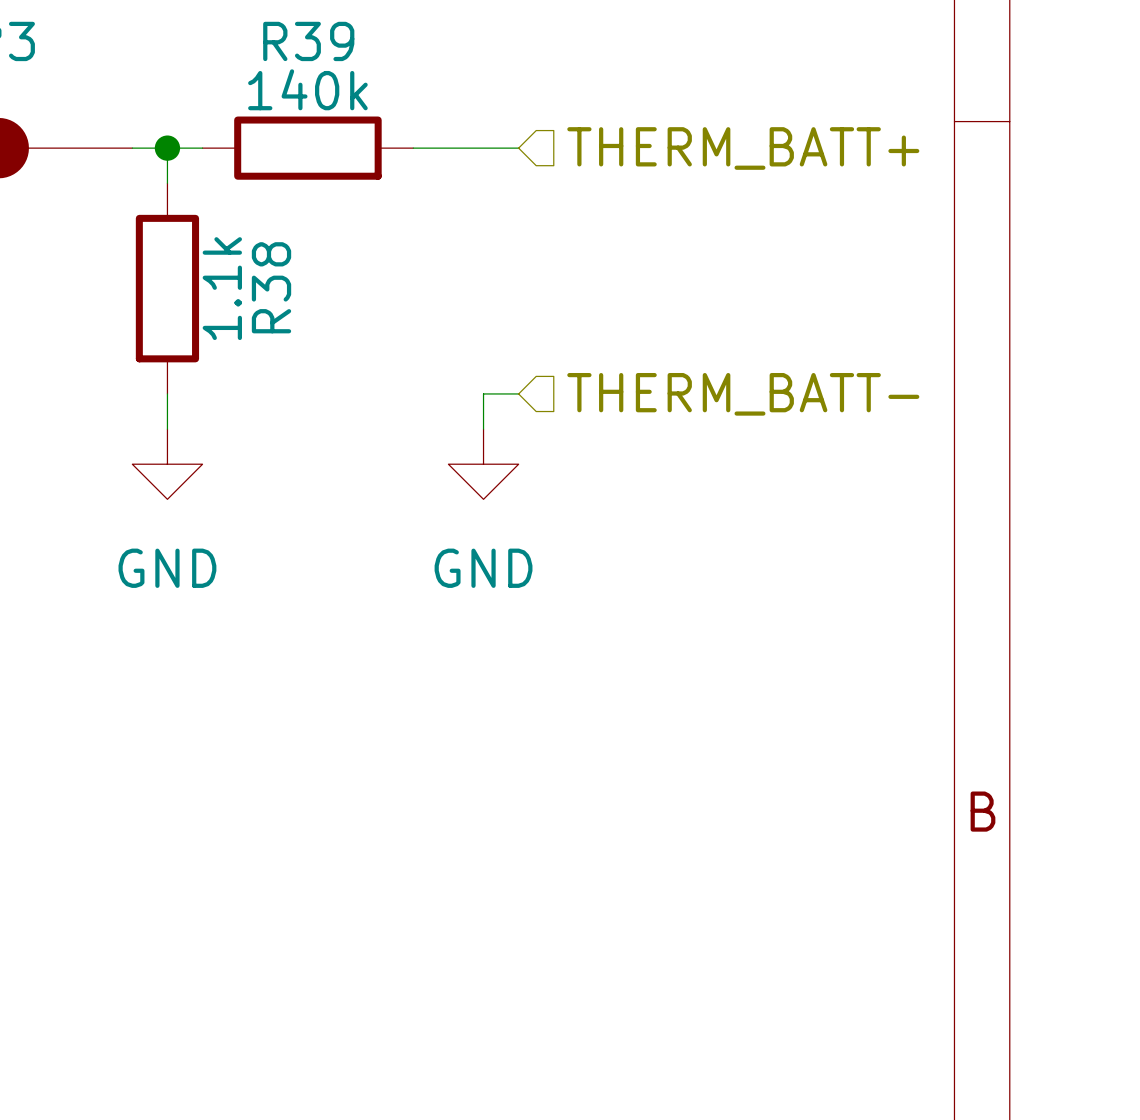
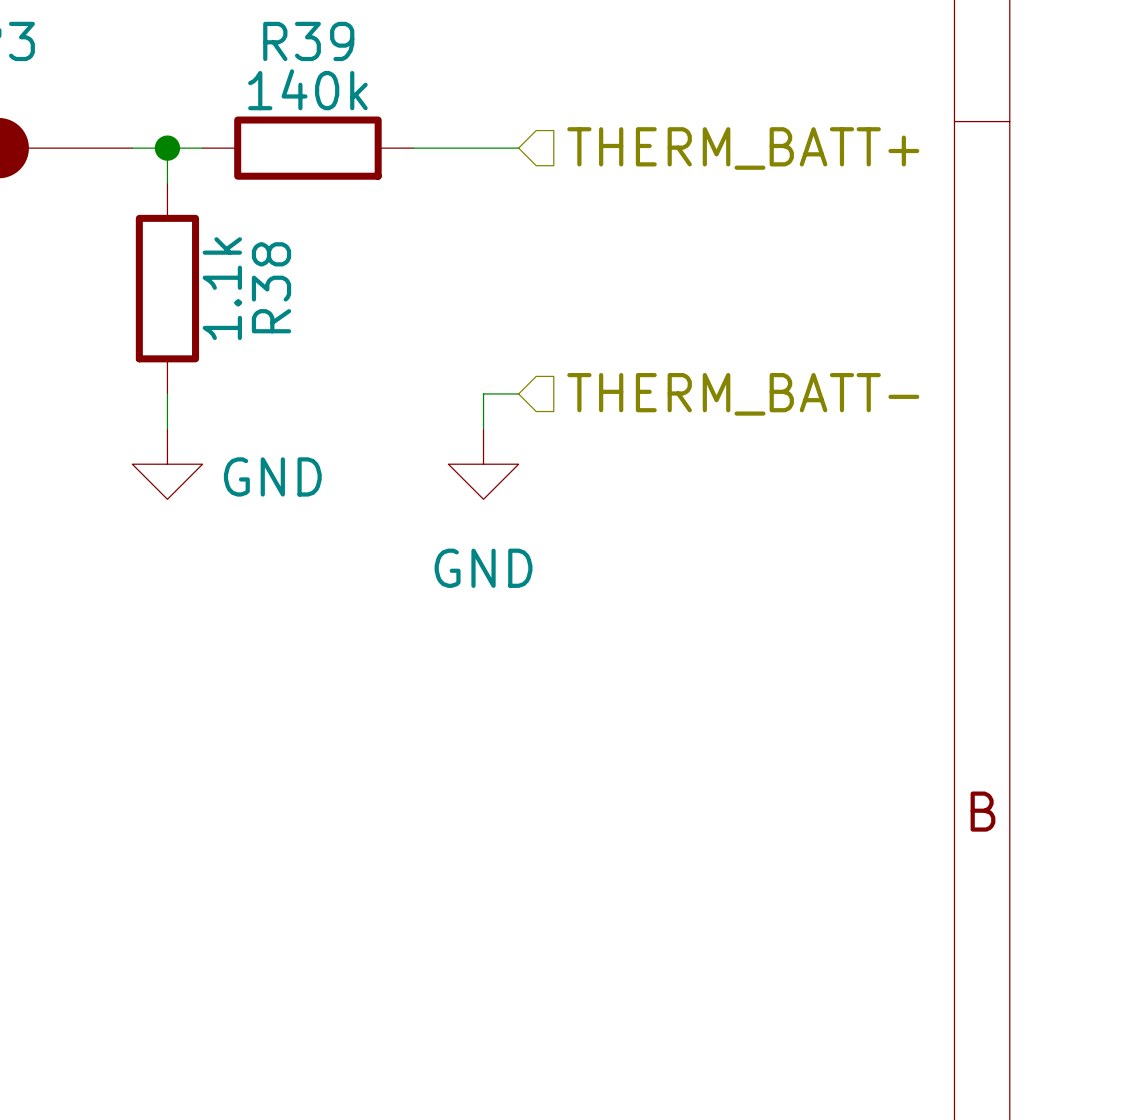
power symbol text position: GND (167, 568) -> GND (272, 476)

